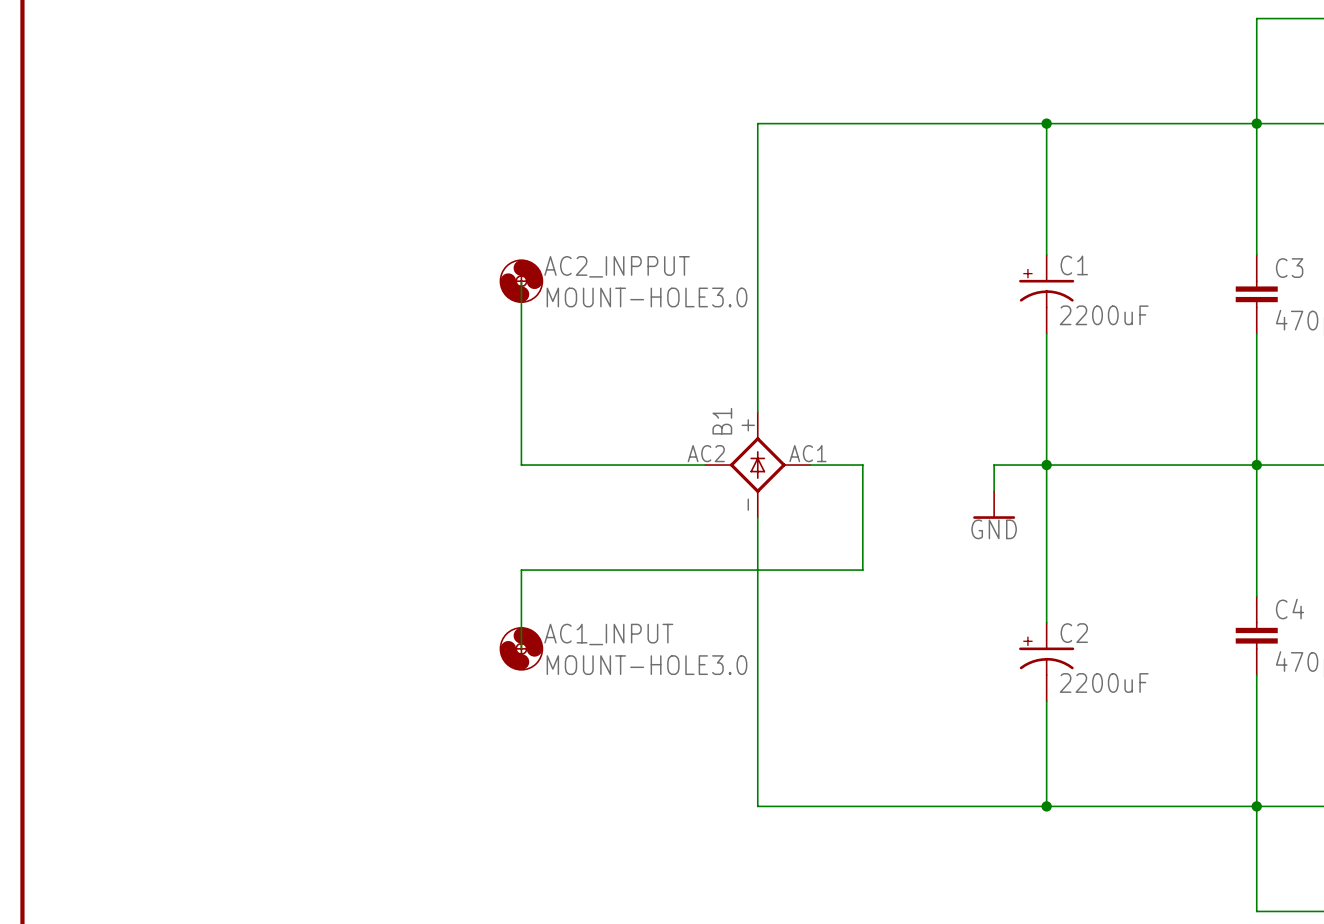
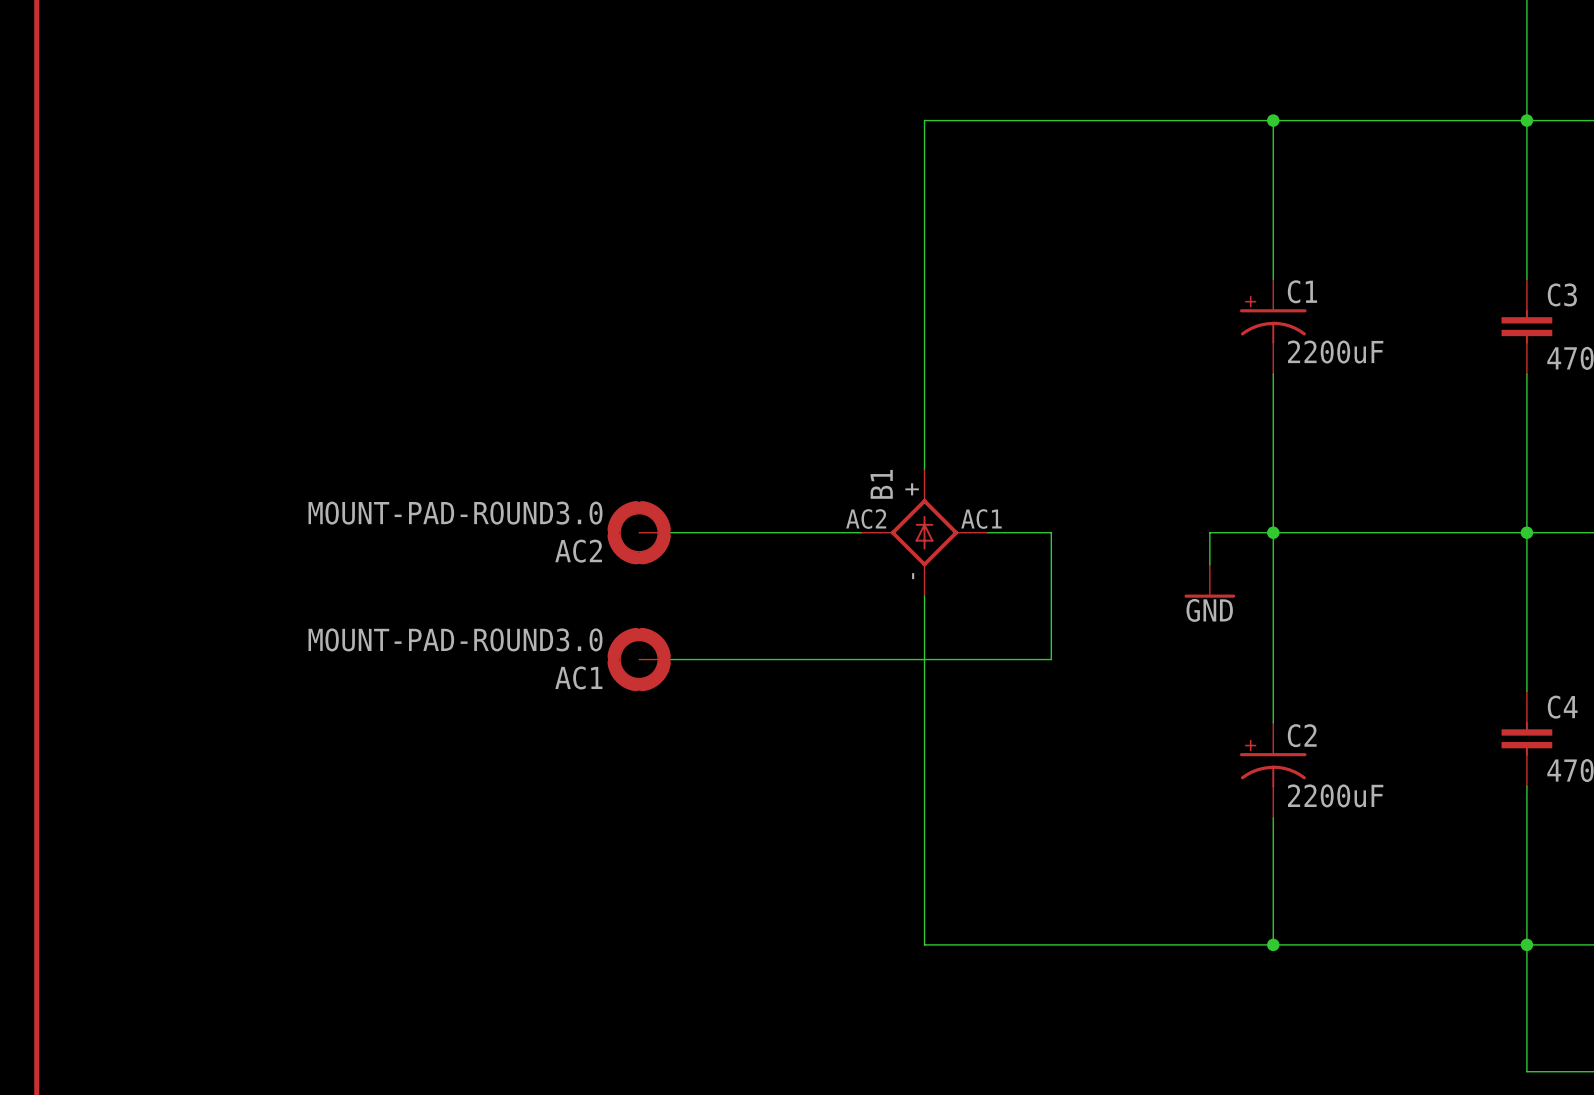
wire: (521, 281) (521, 465) (547, 465) -> none
AC2_INPPUT: MOUNT-HOLE3.0 (521, 281) -> none
AC2: none -> MOUNT-PAD-ROUND3.0 (639, 532)
AC1: none -> MOUNT-PAD-ROUND3.0 (639, 659)
wire: (547, 570) (521, 570) (521, 648) -> none
AC1_INPUT: MOUNT-HOLE3.0 (521, 648) -> none

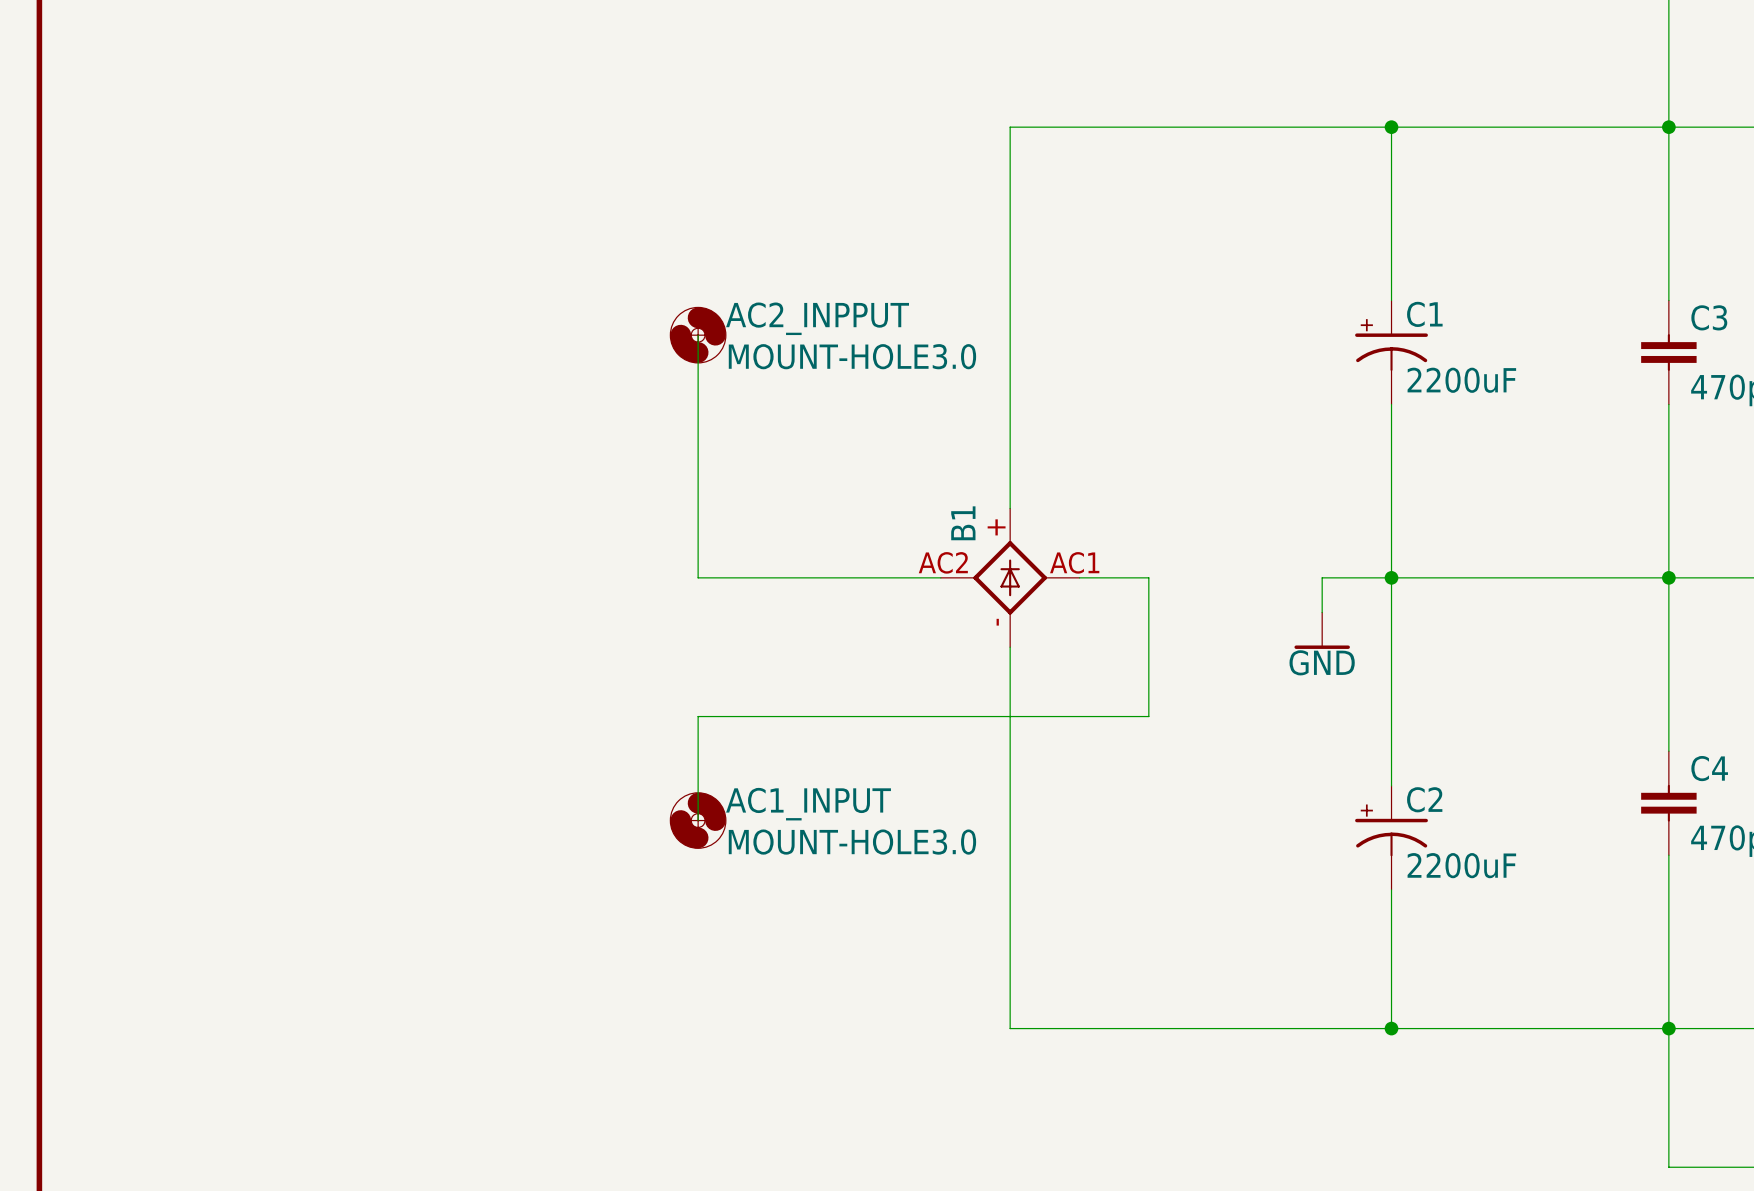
wire: none -> (698, 335) (698, 577) (732, 577)
AC2_INPPUT: none -> MOUNT-HOLE3.0 (698, 335)
AC2: MOUNT-PAD-ROUND3.0 (639, 532) -> none
AC1: MOUNT-PAD-ROUND3.0 (639, 659) -> none
wire: none -> (732, 716) (698, 716) (698, 820)
AC1_INPUT: none -> MOUNT-HOLE3.0 (698, 820)

